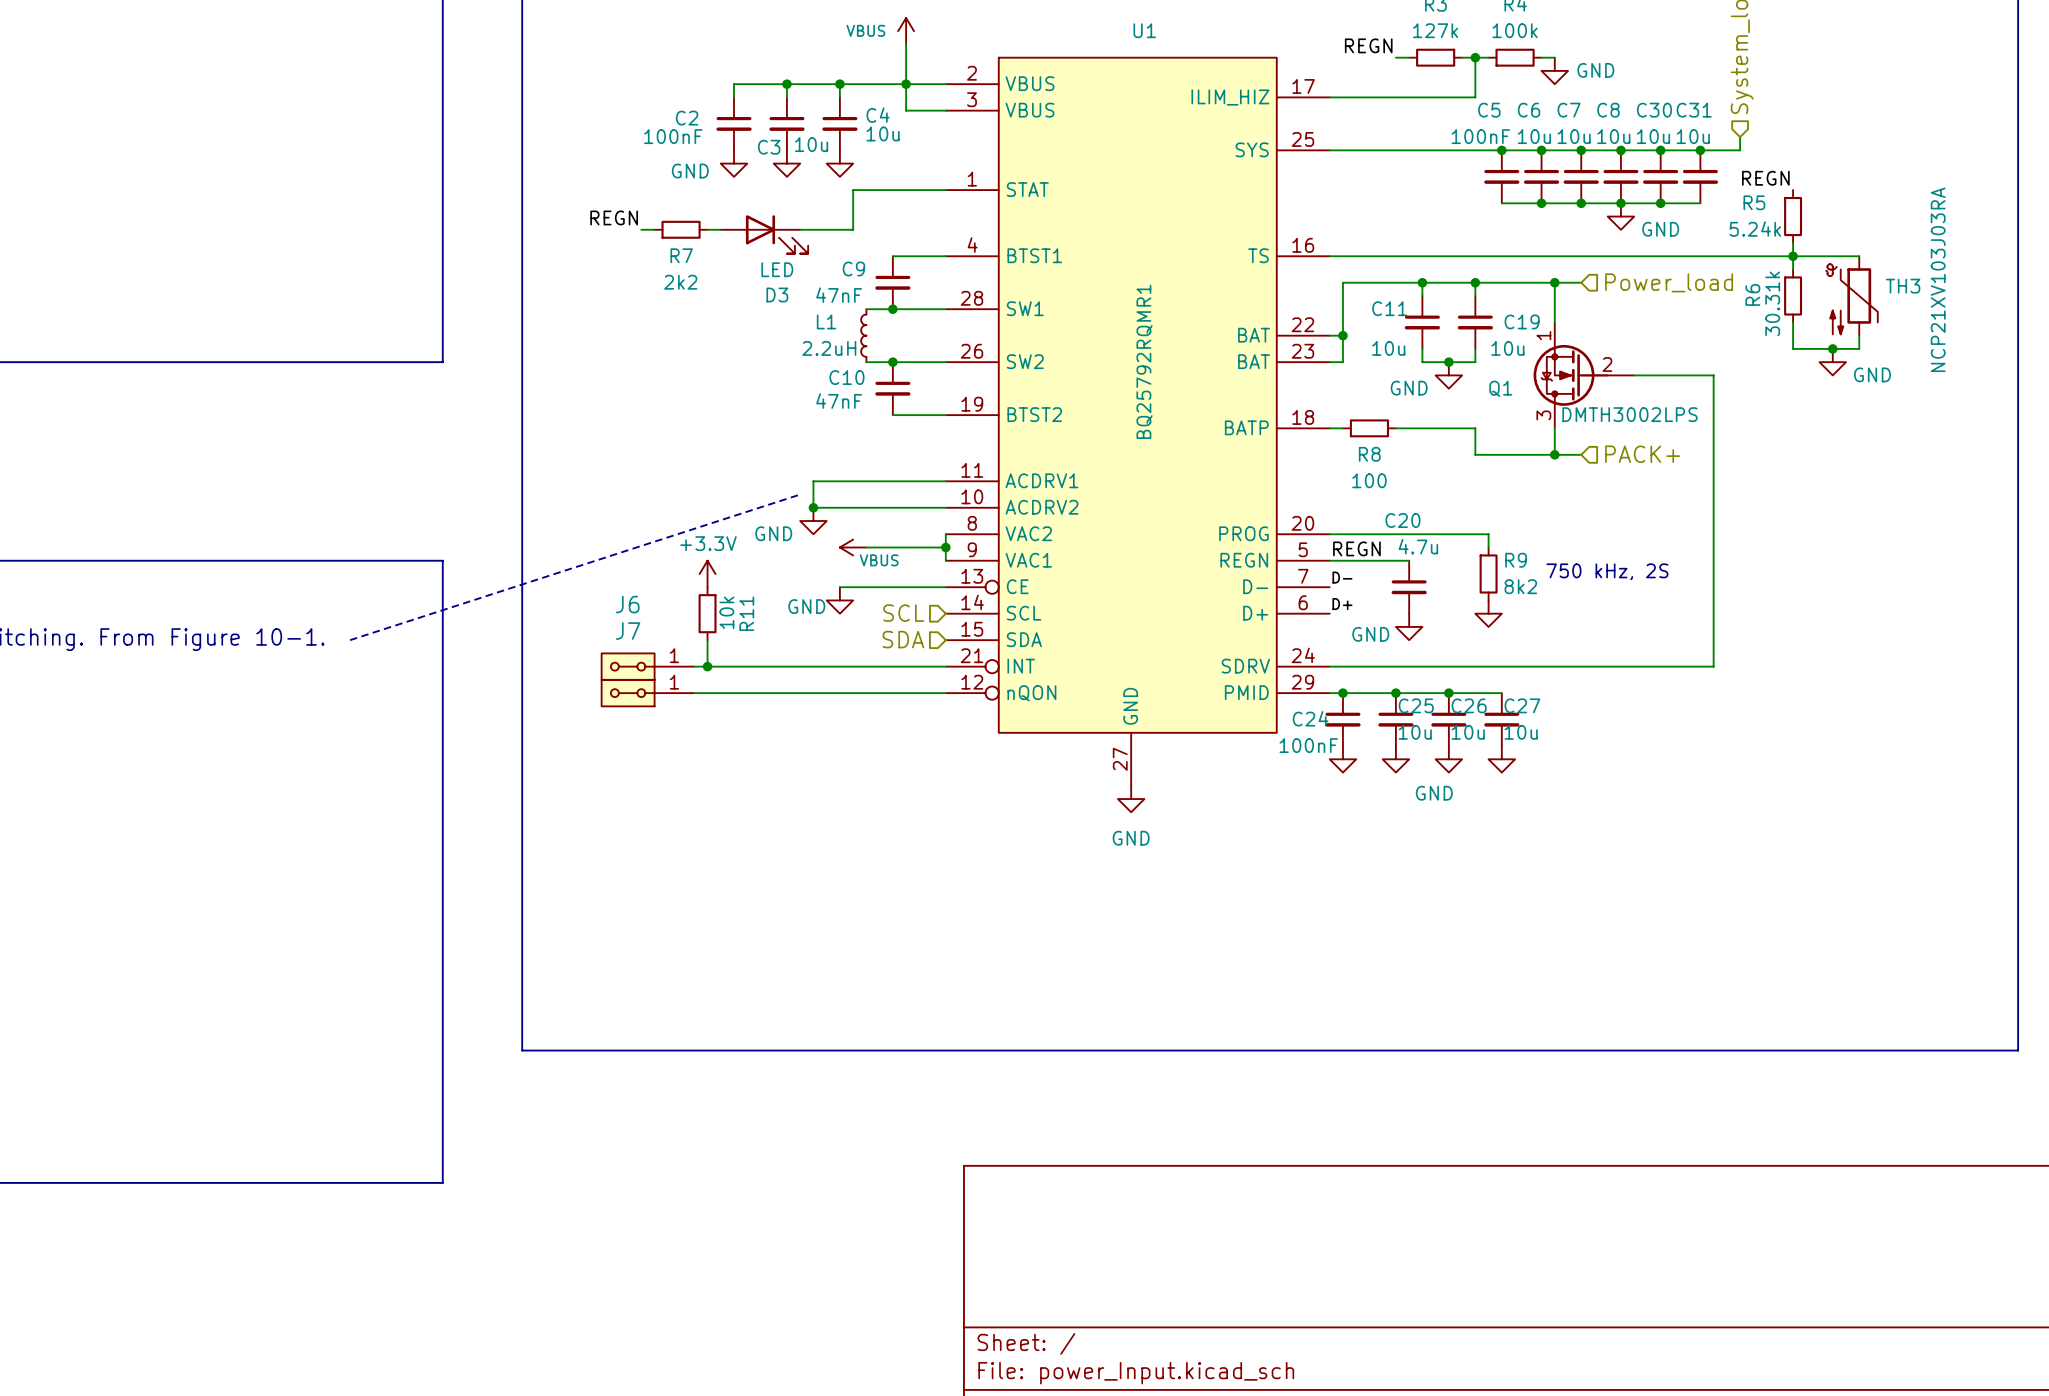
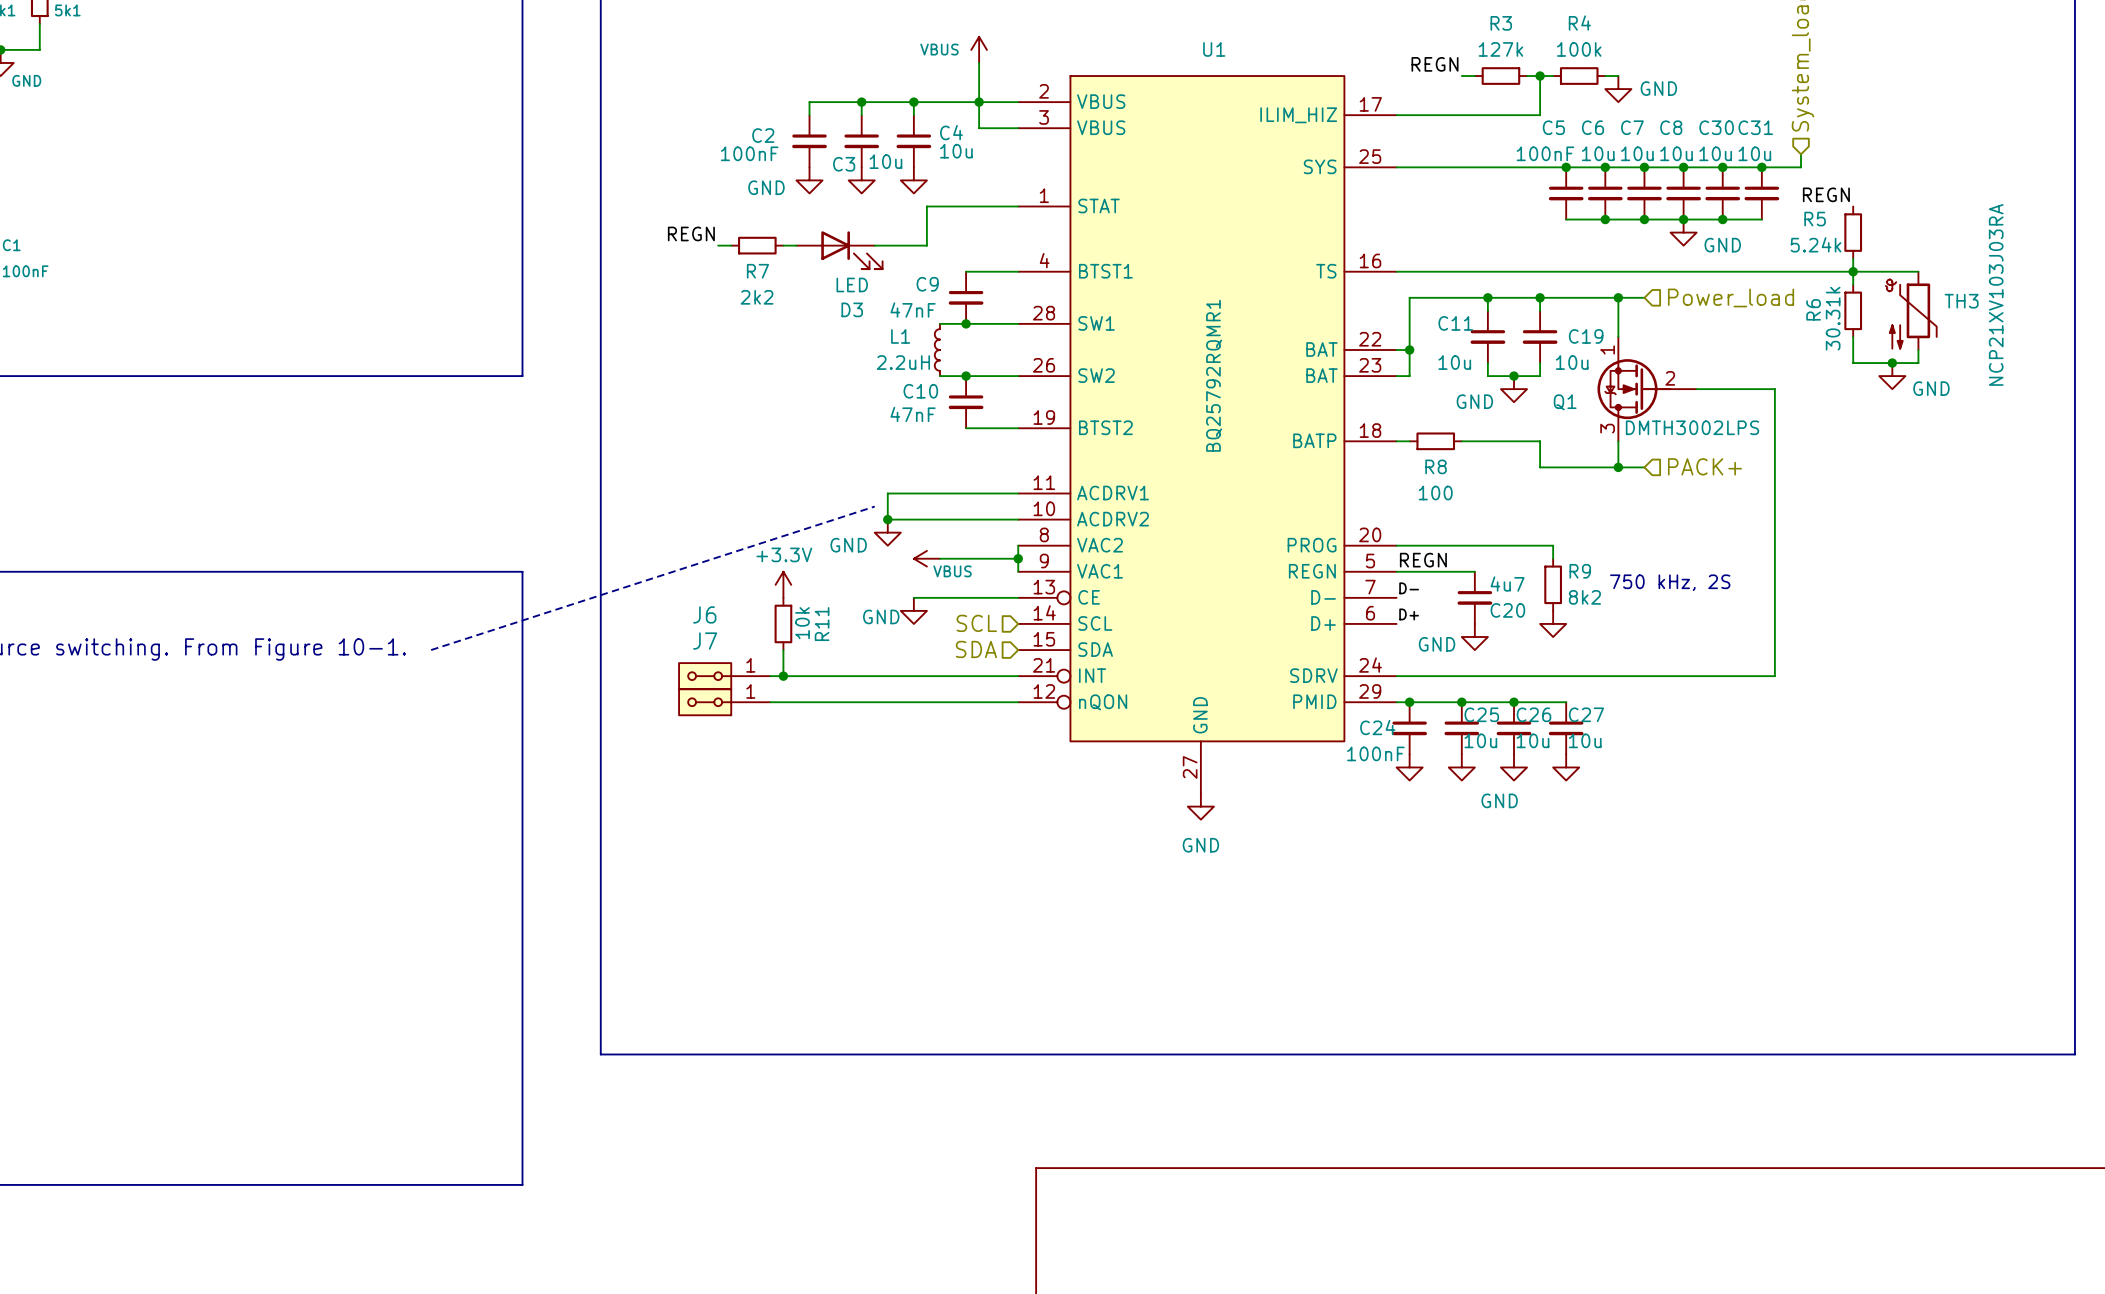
C20 name position: C20 (1402, 520) -> C20 (1507, 610)
C20 value: 4.7u (1418, 546) -> 4u7 (1507, 584)

